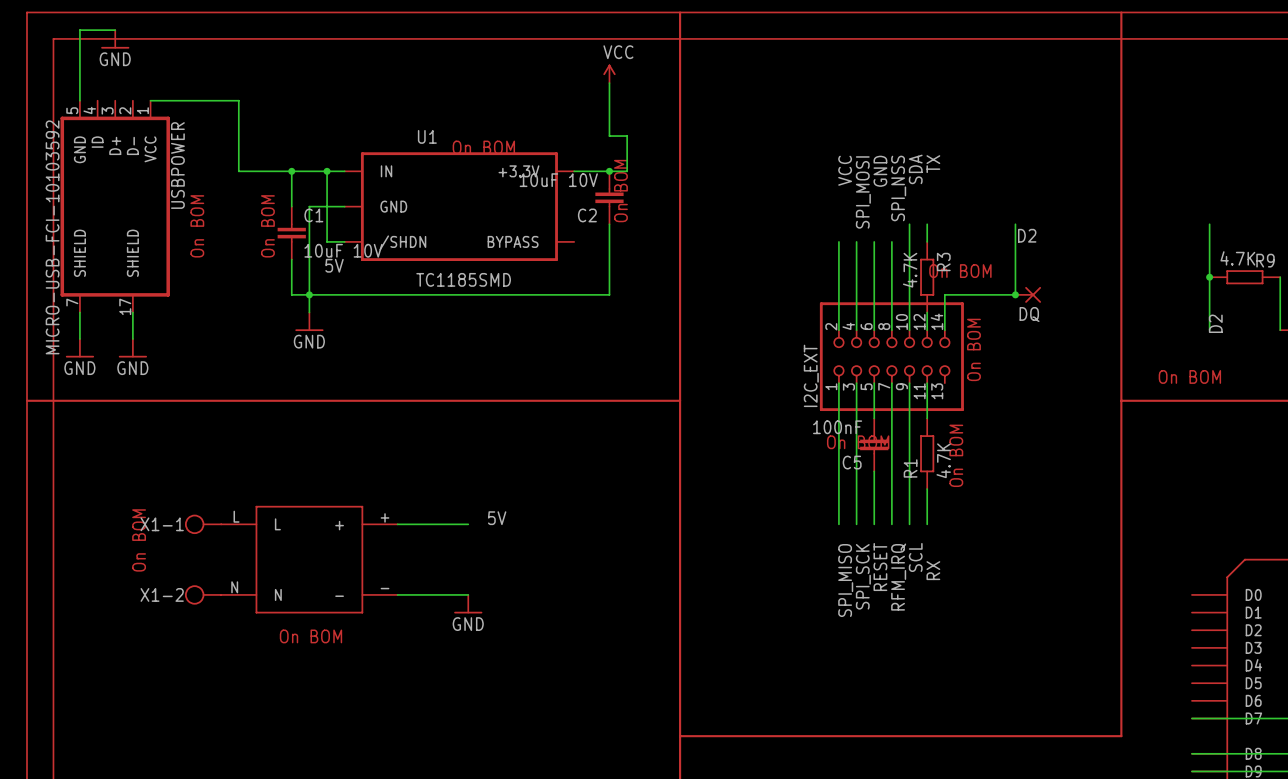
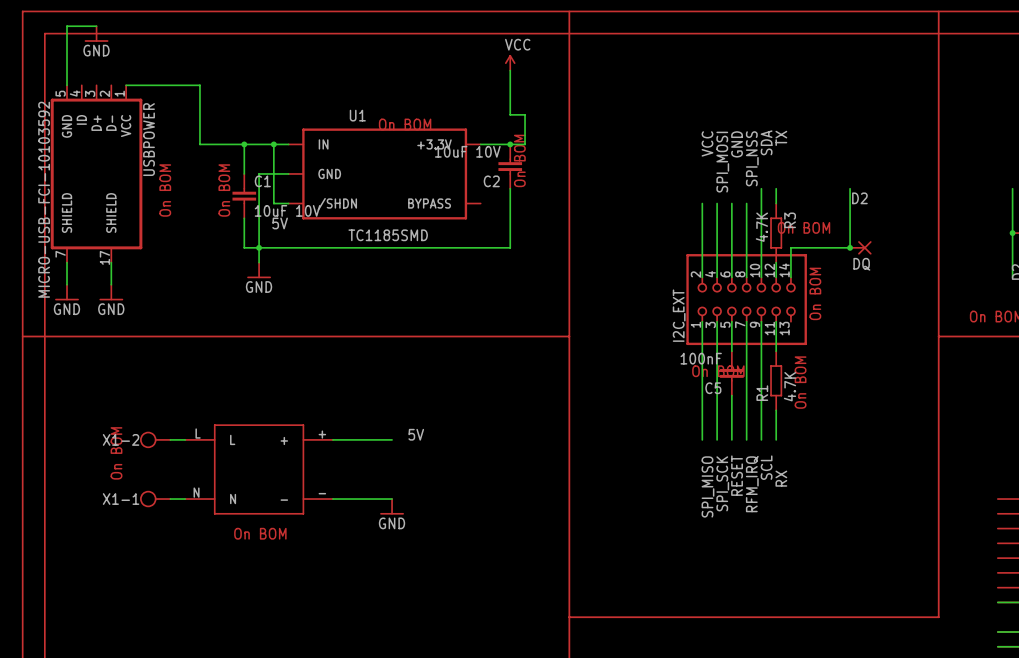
X1-1 position: (203, 524) -> (155, 499)
X1-2 position: (203, 594) -> (155, 439)

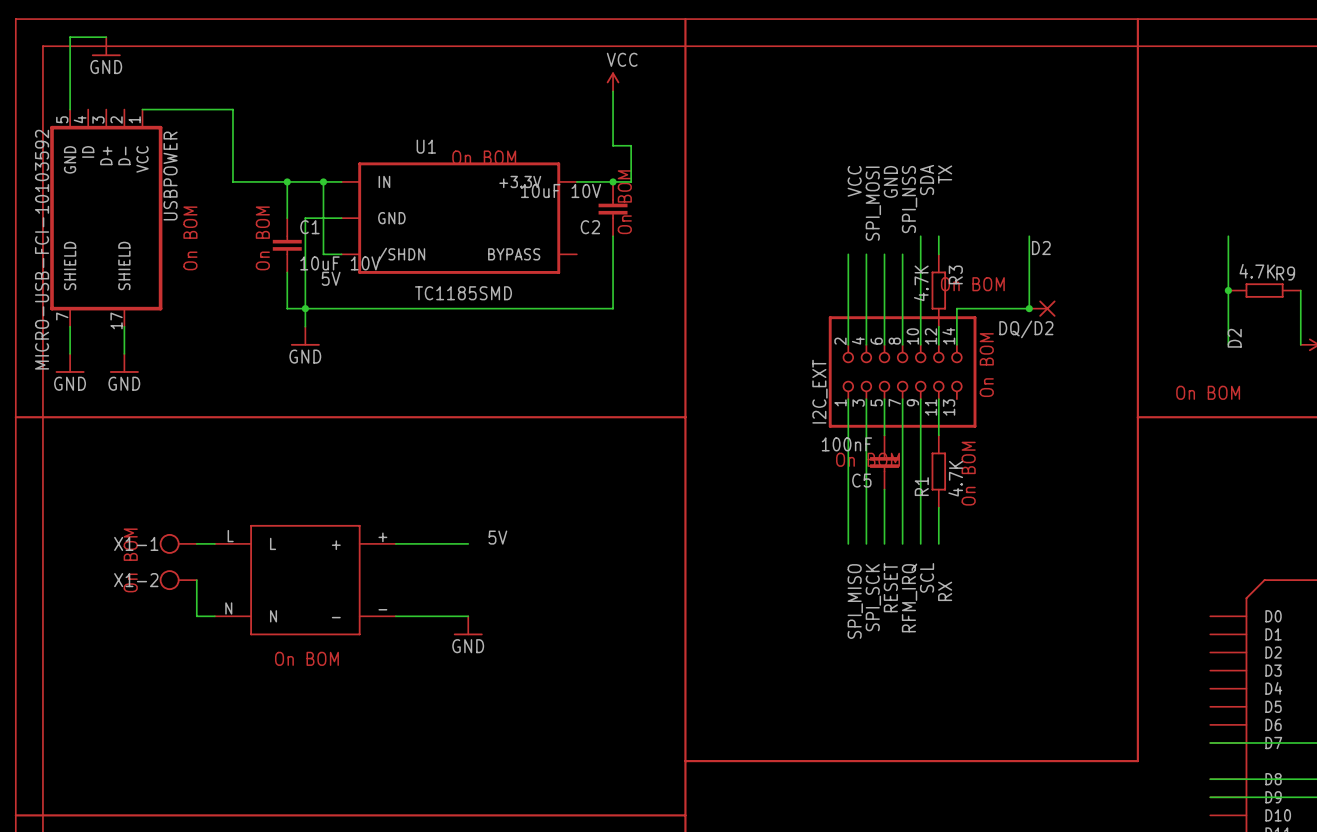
DQ name: DQ (861, 264) -> DQ/D2 (1026, 329)
X1-2 name: X1-2 (121, 439) -> X1-1 (136, 543)
X1-2: none -> (178, 580)
wire: none -> (196, 580) (196, 616)
X1-1: (155, 499) -> none

